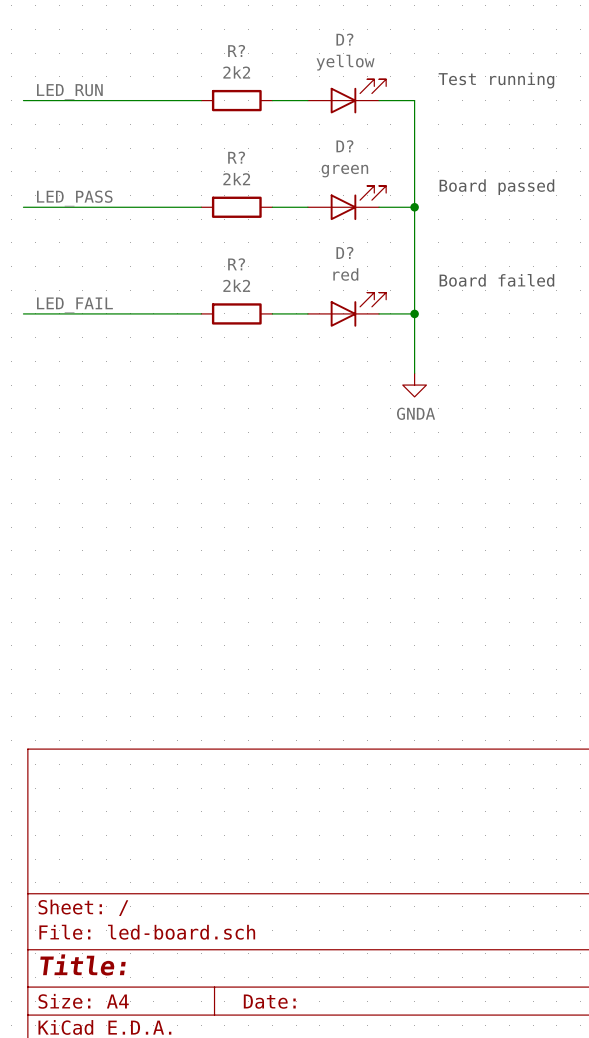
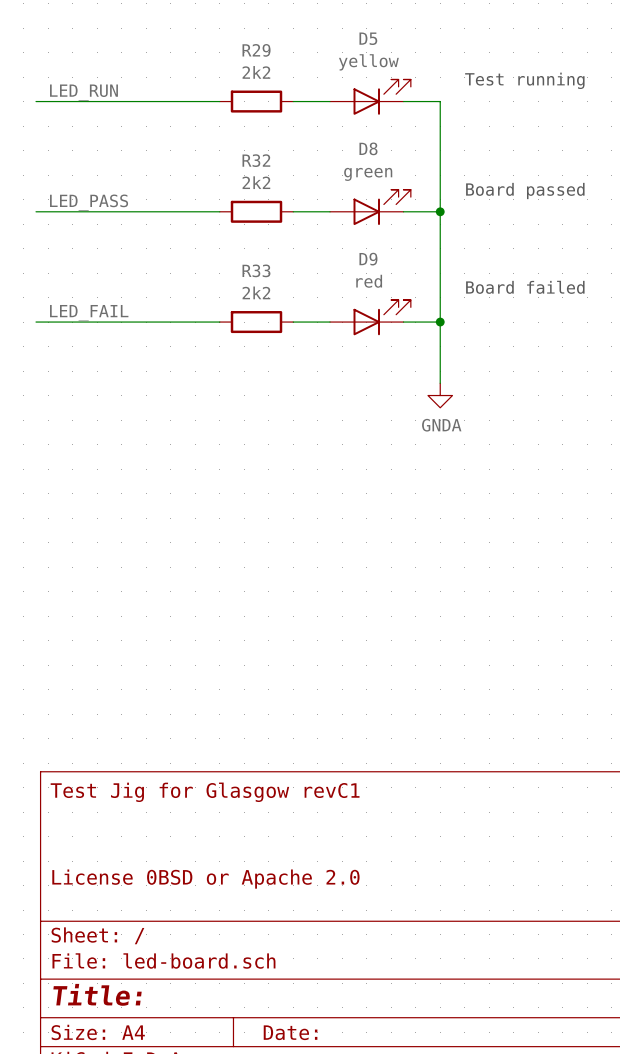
D? name: D? (344, 39) -> D5 (368, 38)
R? name: R? (236, 50) -> R29 (256, 50)
D? name: D? (344, 146) -> D8 (368, 148)
R? name: R? (236, 157) -> R32 (256, 160)
D? name: D? (344, 252) -> D9 (368, 259)
R? name: R? (236, 264) -> R33 (256, 270)
title block: none -> Test Jig for Glasgow revC1 (205, 792)
title block: none -> License 0BSD or Apache 2.0 (205, 879)

